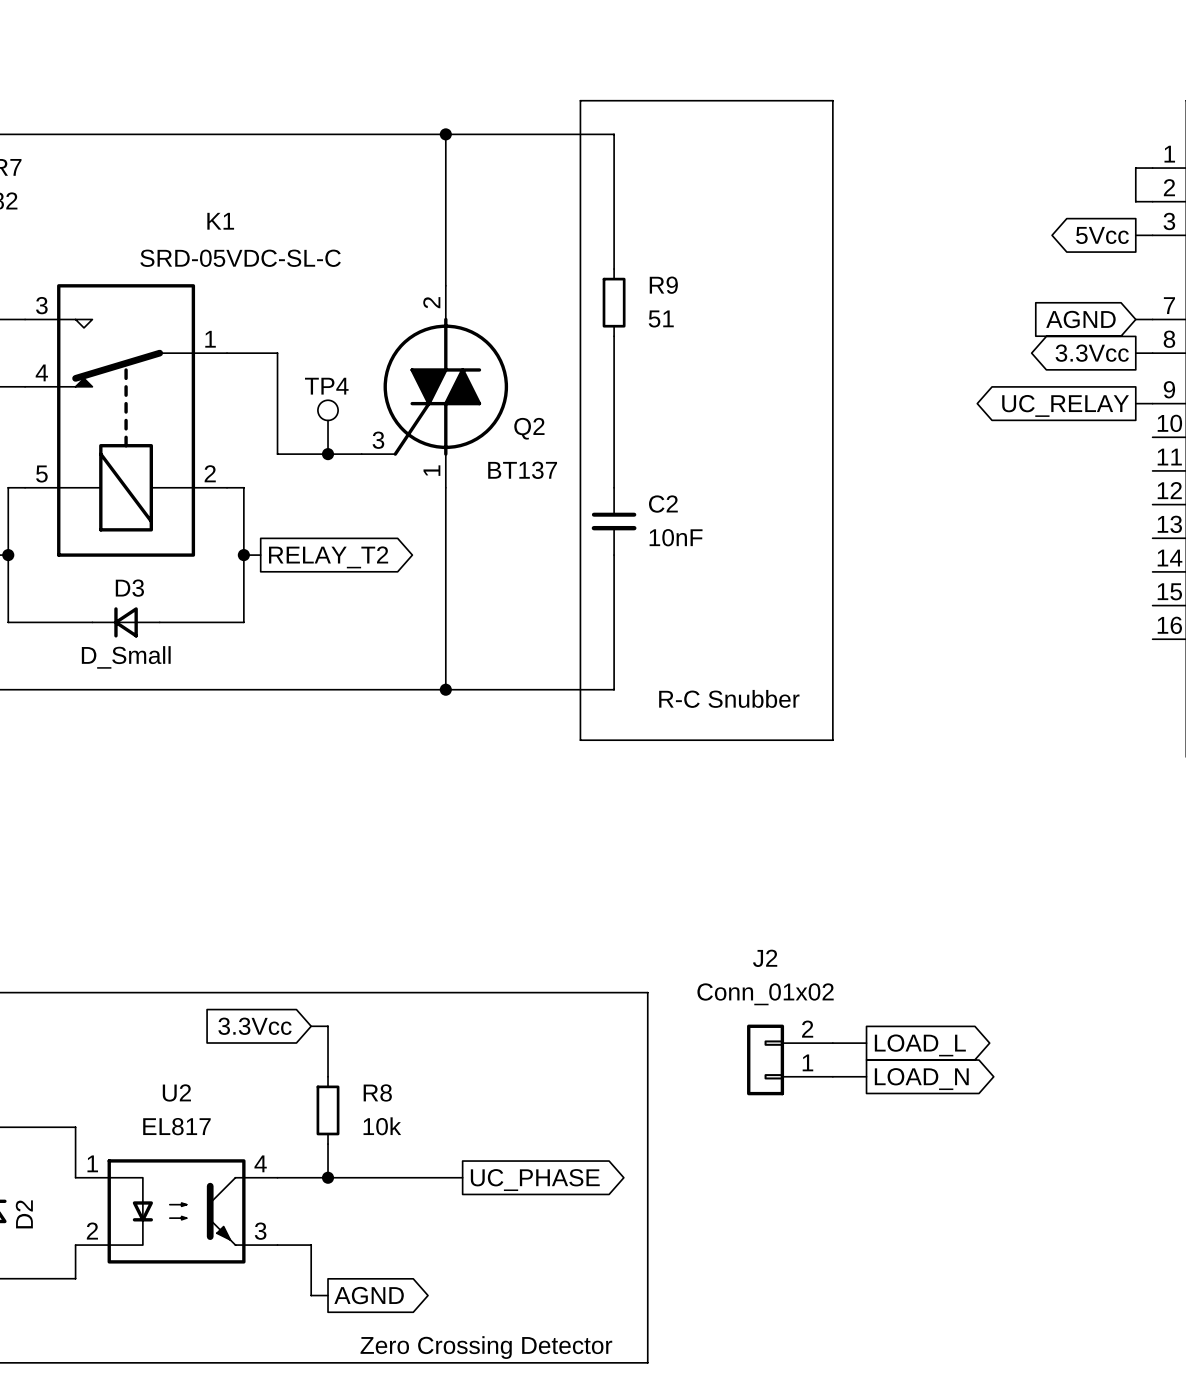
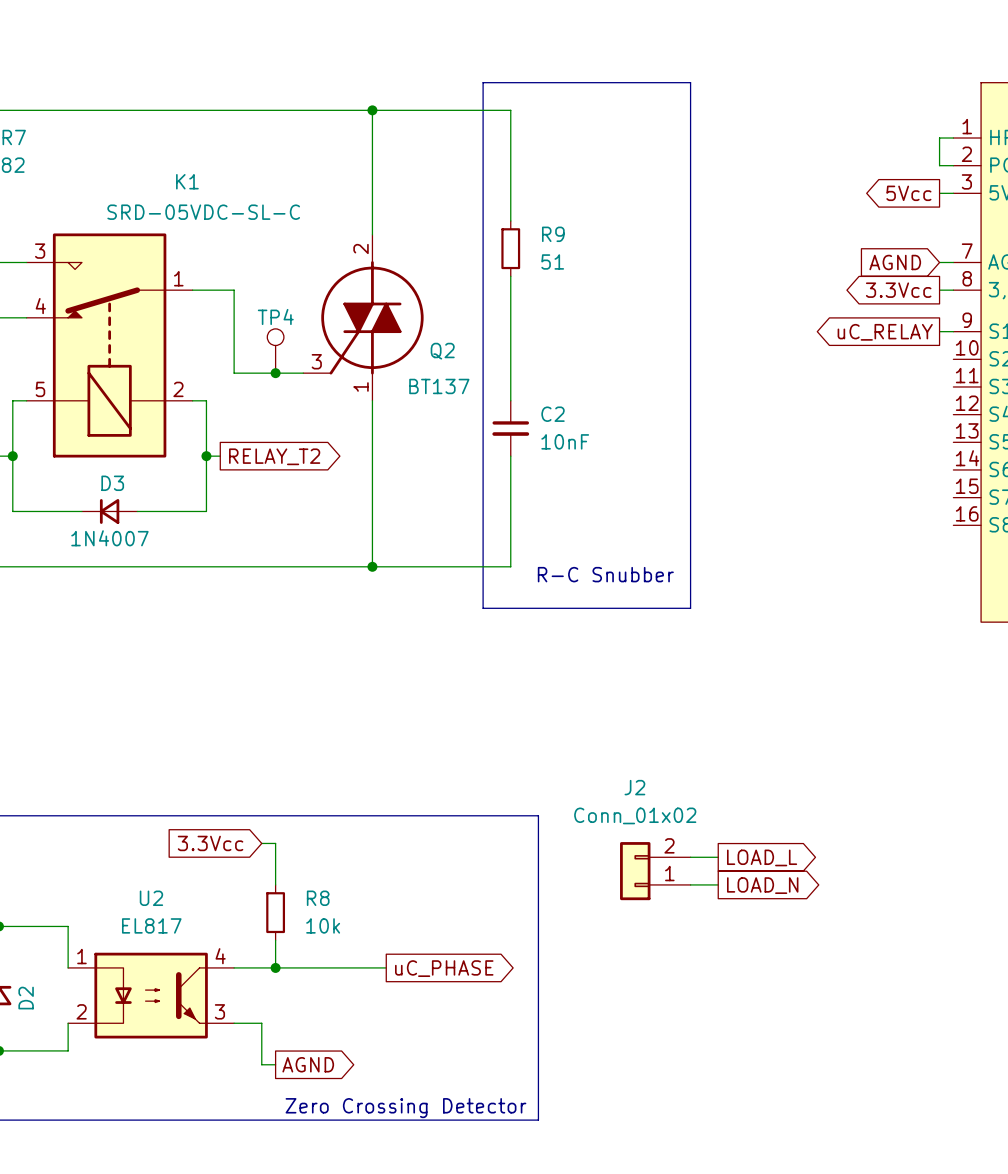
global label: UC_RELAY (1065, 405) -> uC_RELAY (885, 332)
D3 value: D_Small (126, 657) -> 1N4007 (109, 538)
global label: UC_PHASE (535, 1180) -> uC_PHASE (444, 968)

